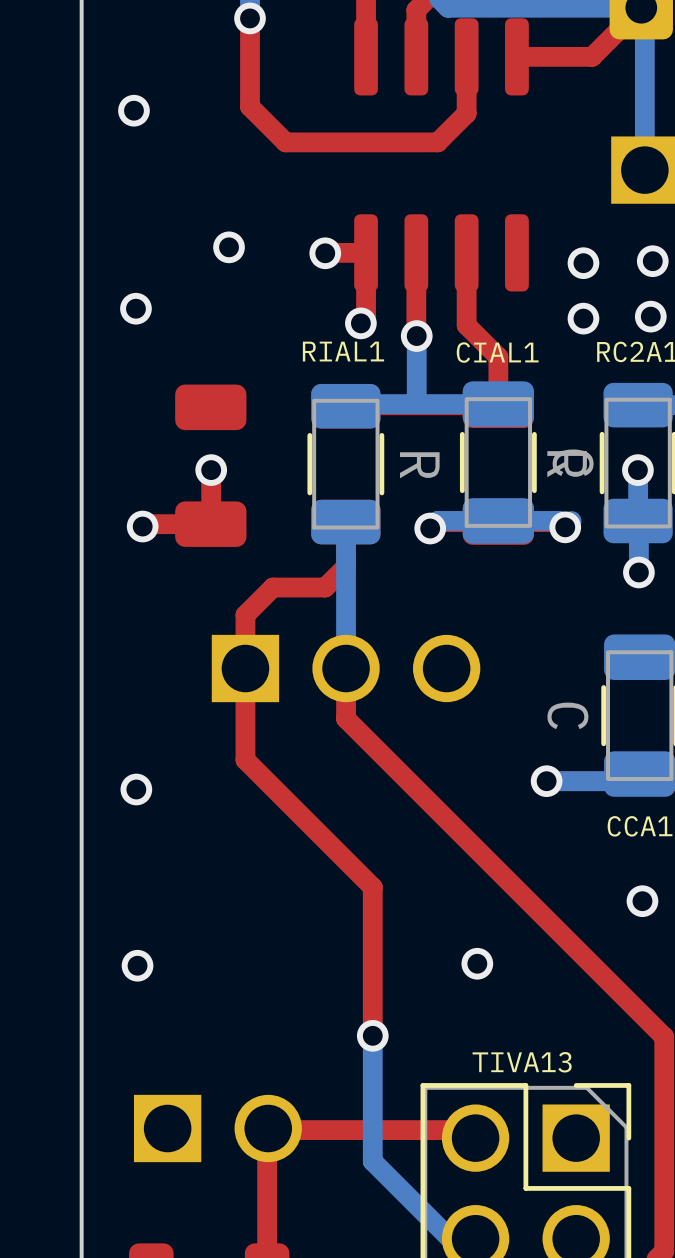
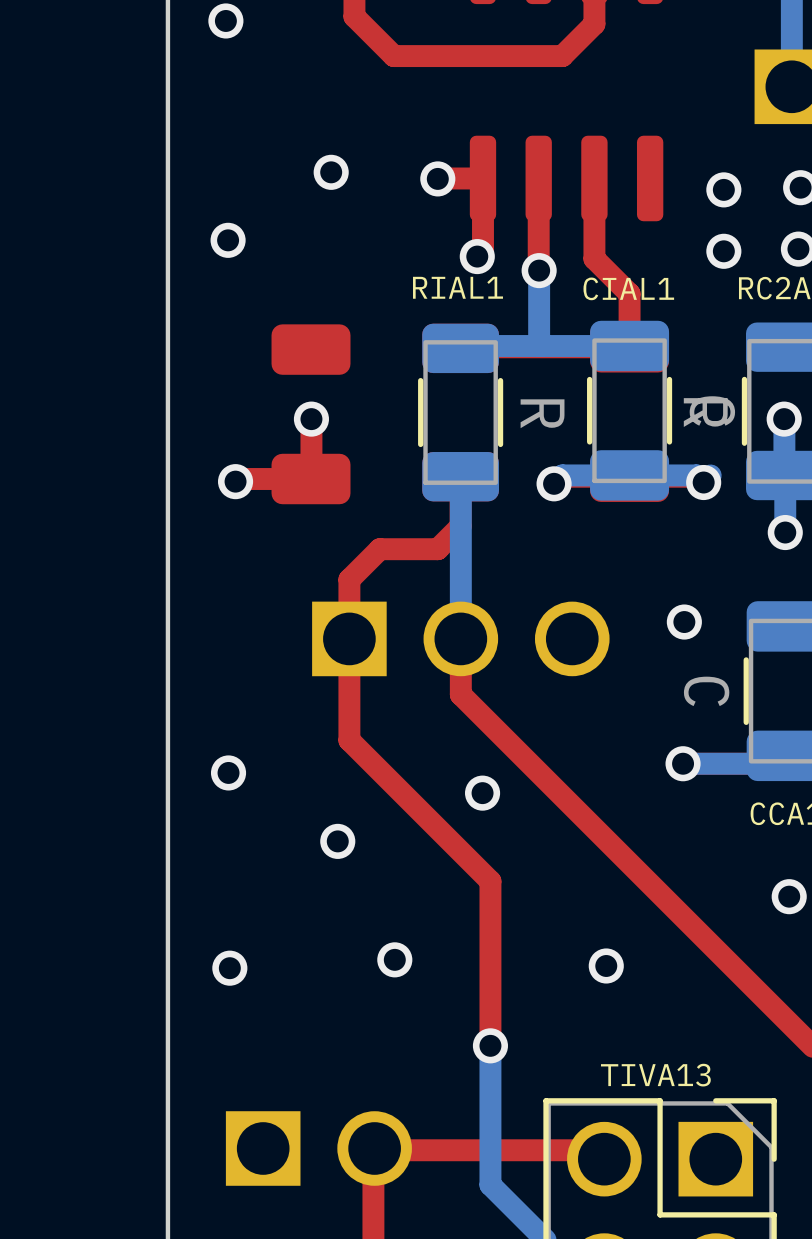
via: none -> (684, 622)
via: none -> (482, 793)
via: none -> (337, 841)
via: none -> (394, 959)

